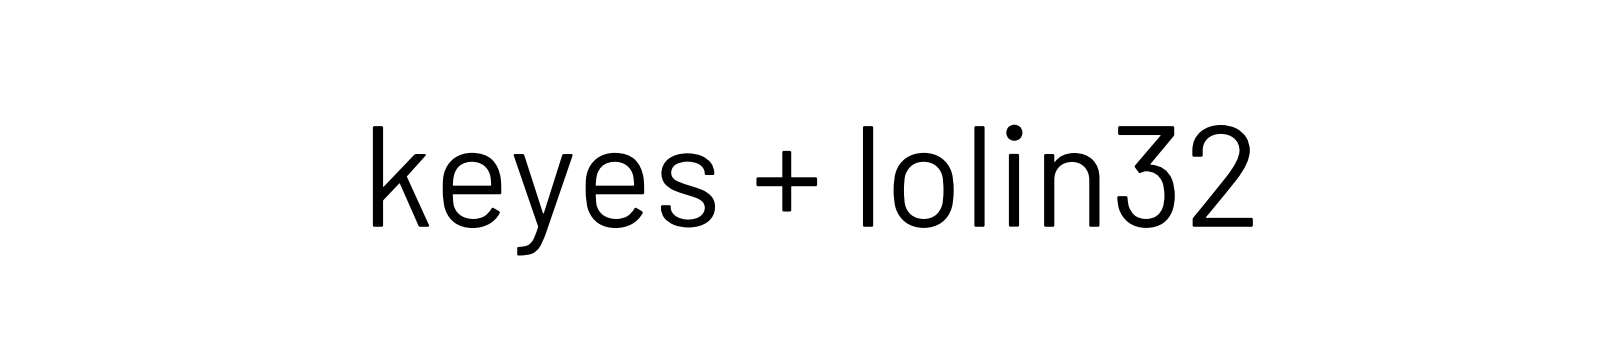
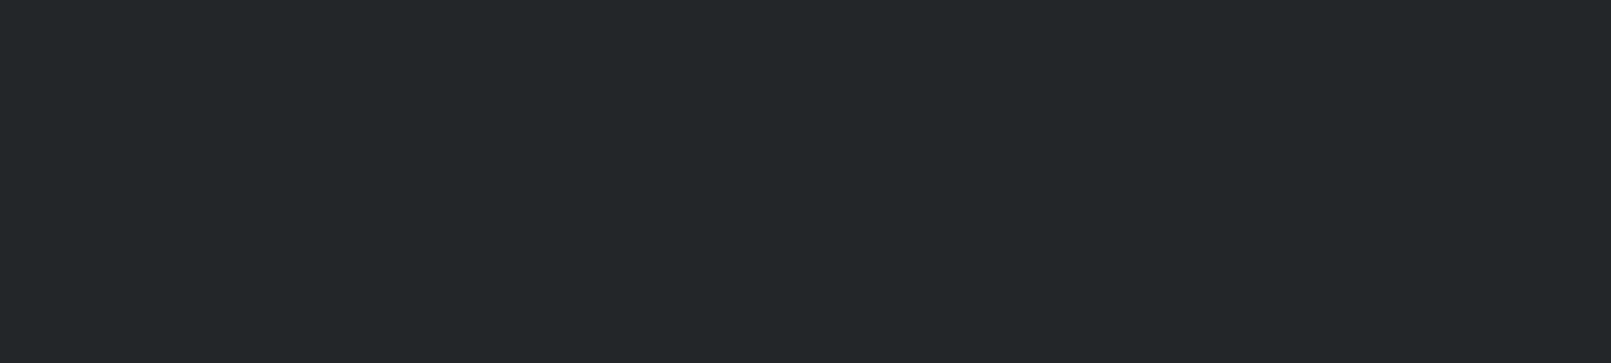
text: keyes + lolin32 (812, 190) -> none

